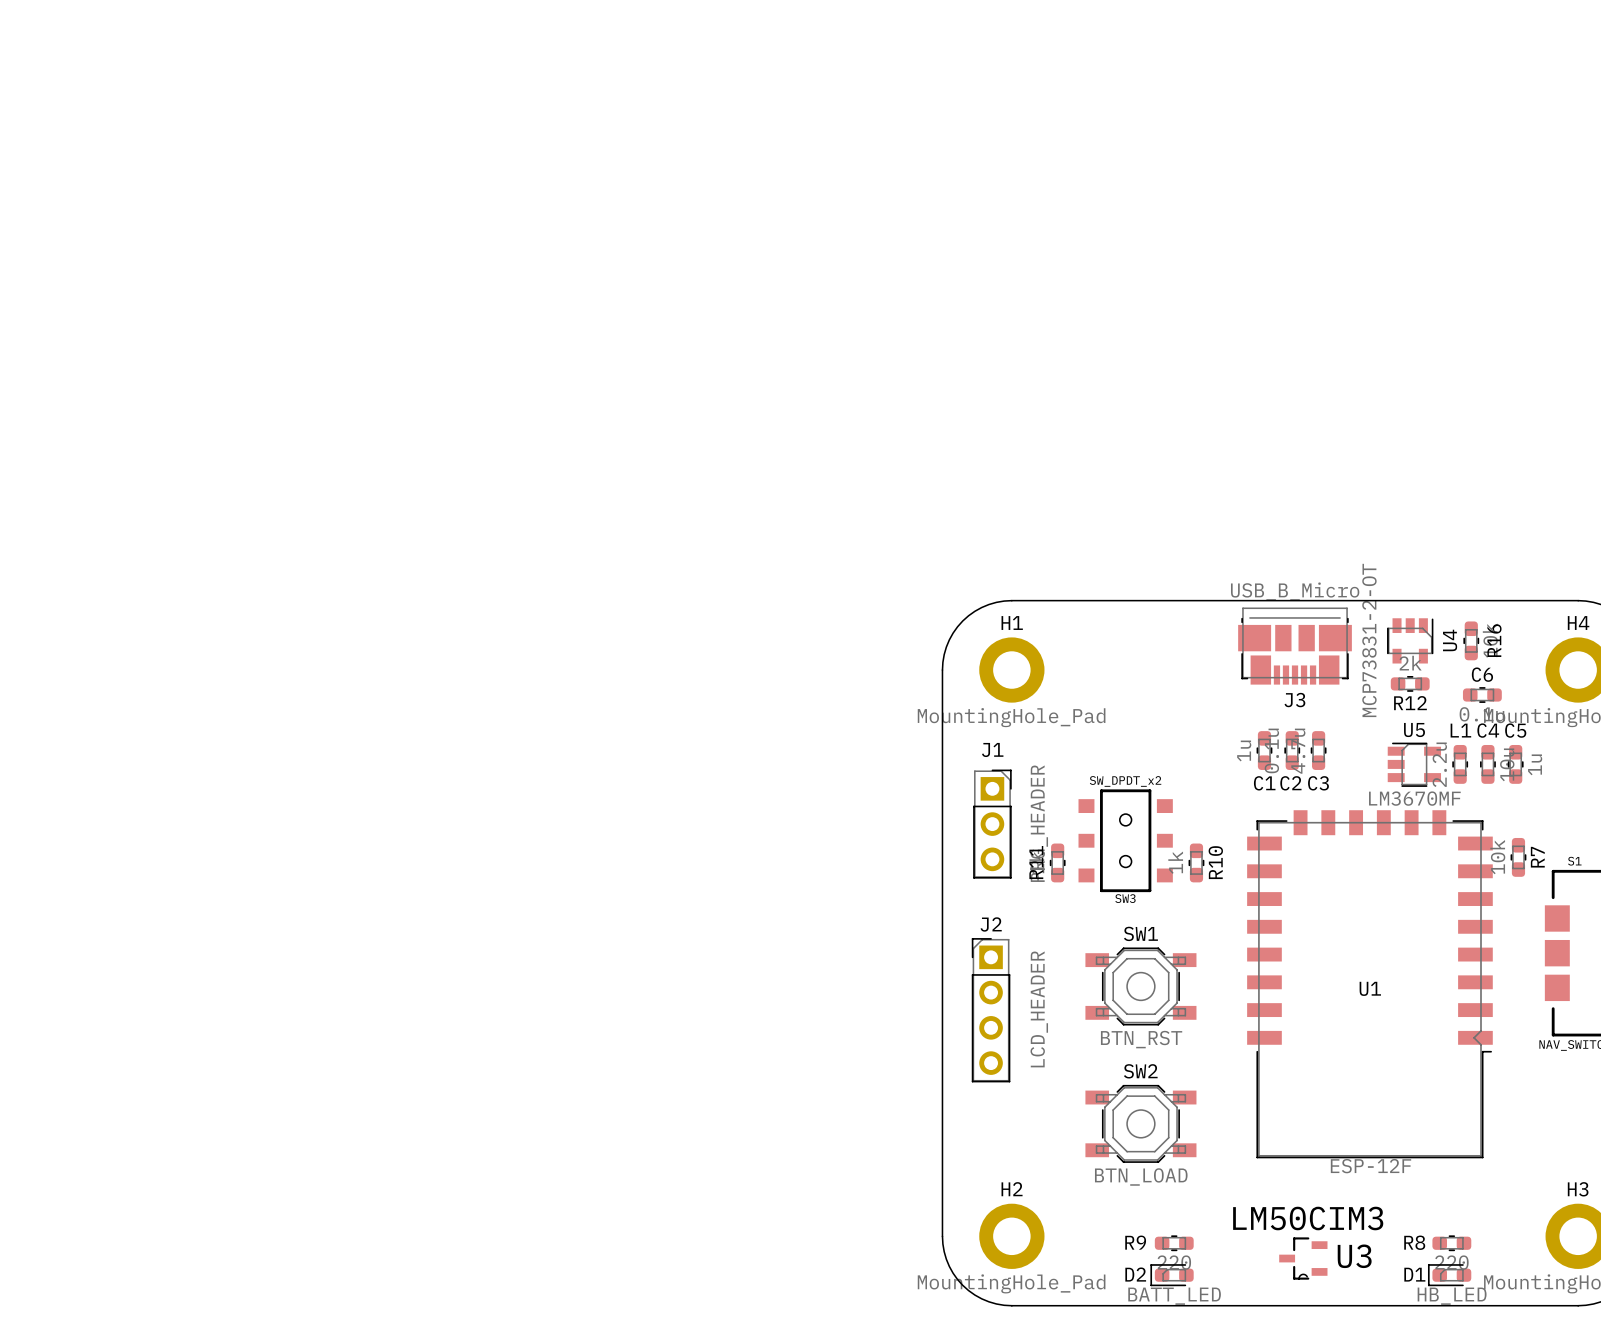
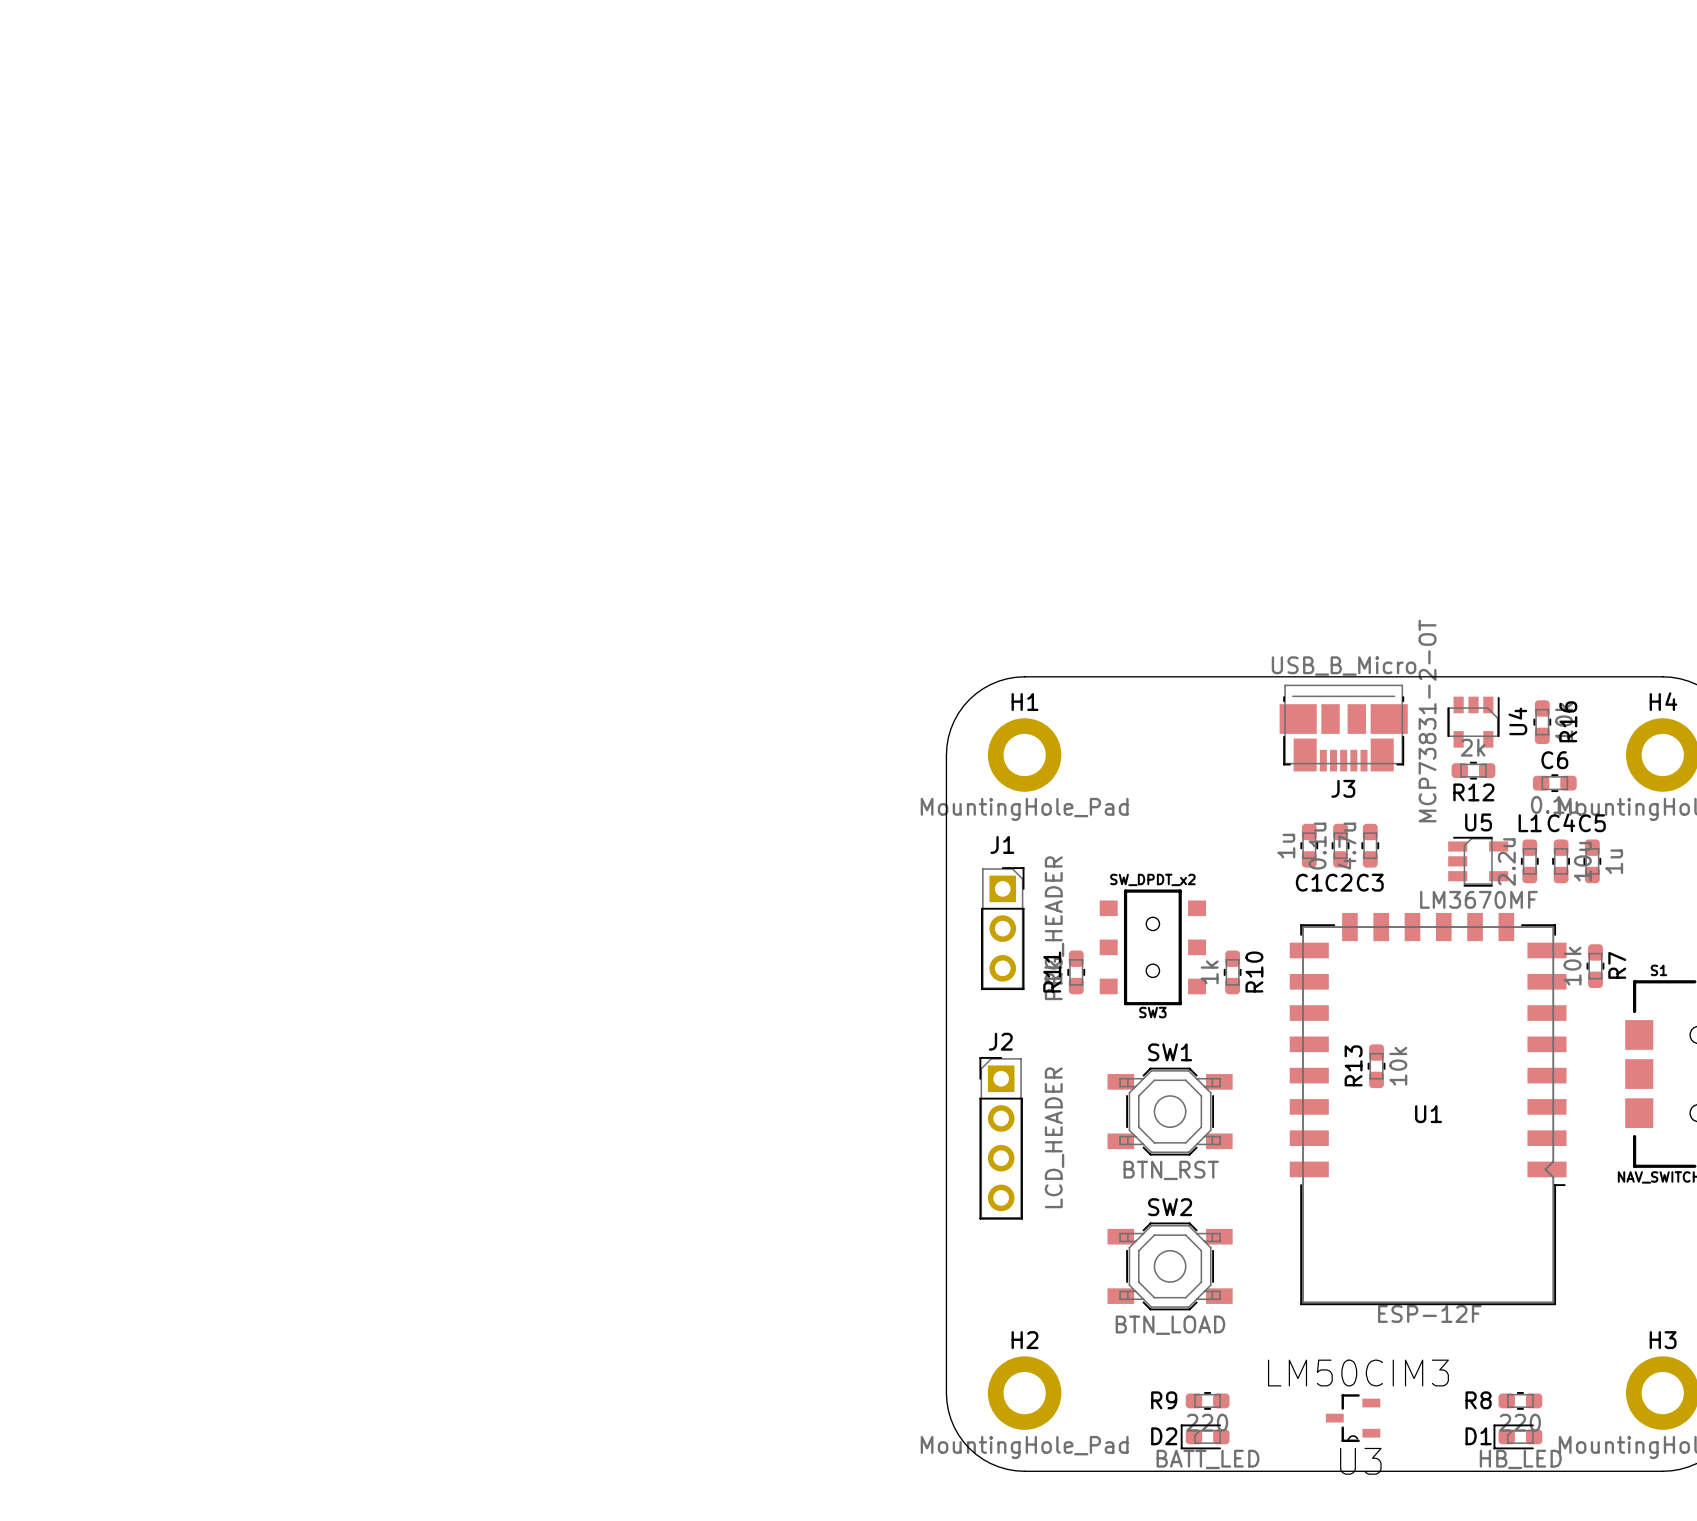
R13: none -> 10k (1376, 1066)
U3 name position: U3 (1354, 1256) -> U3 (1360, 1461)

